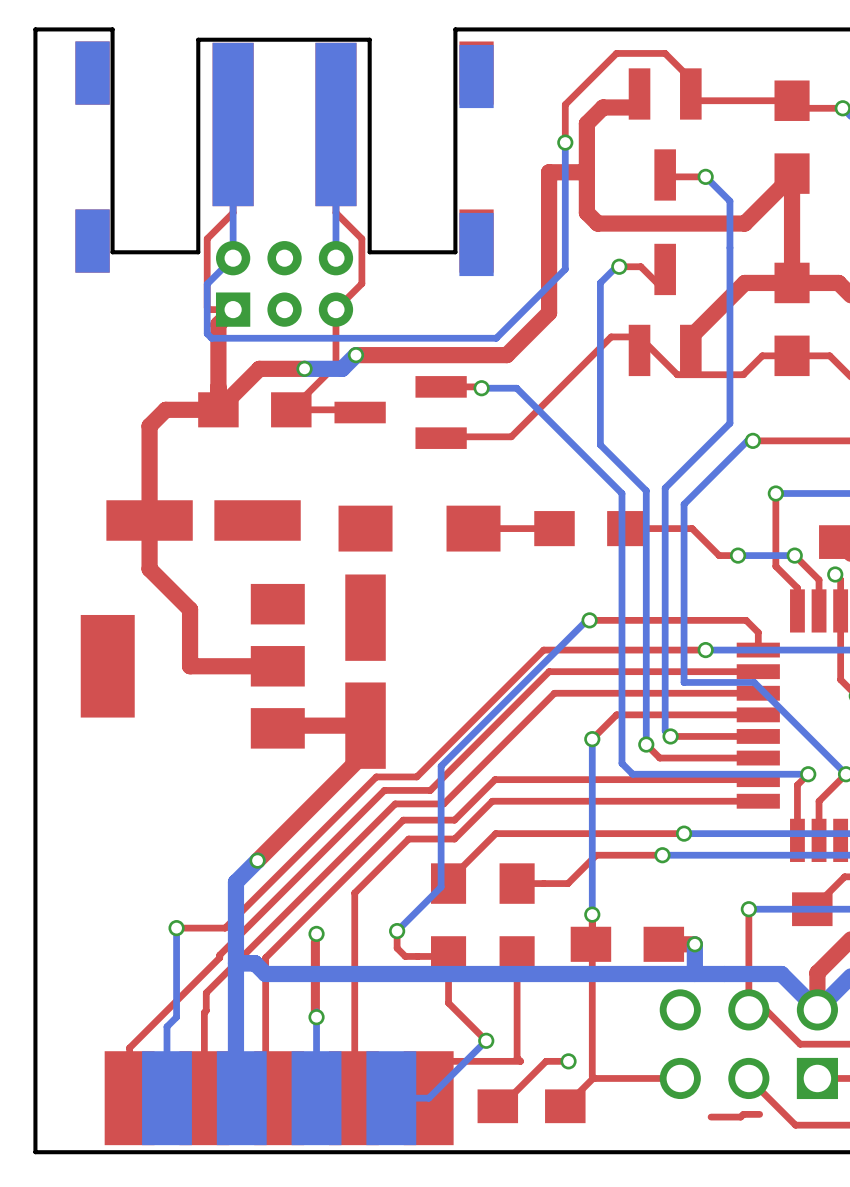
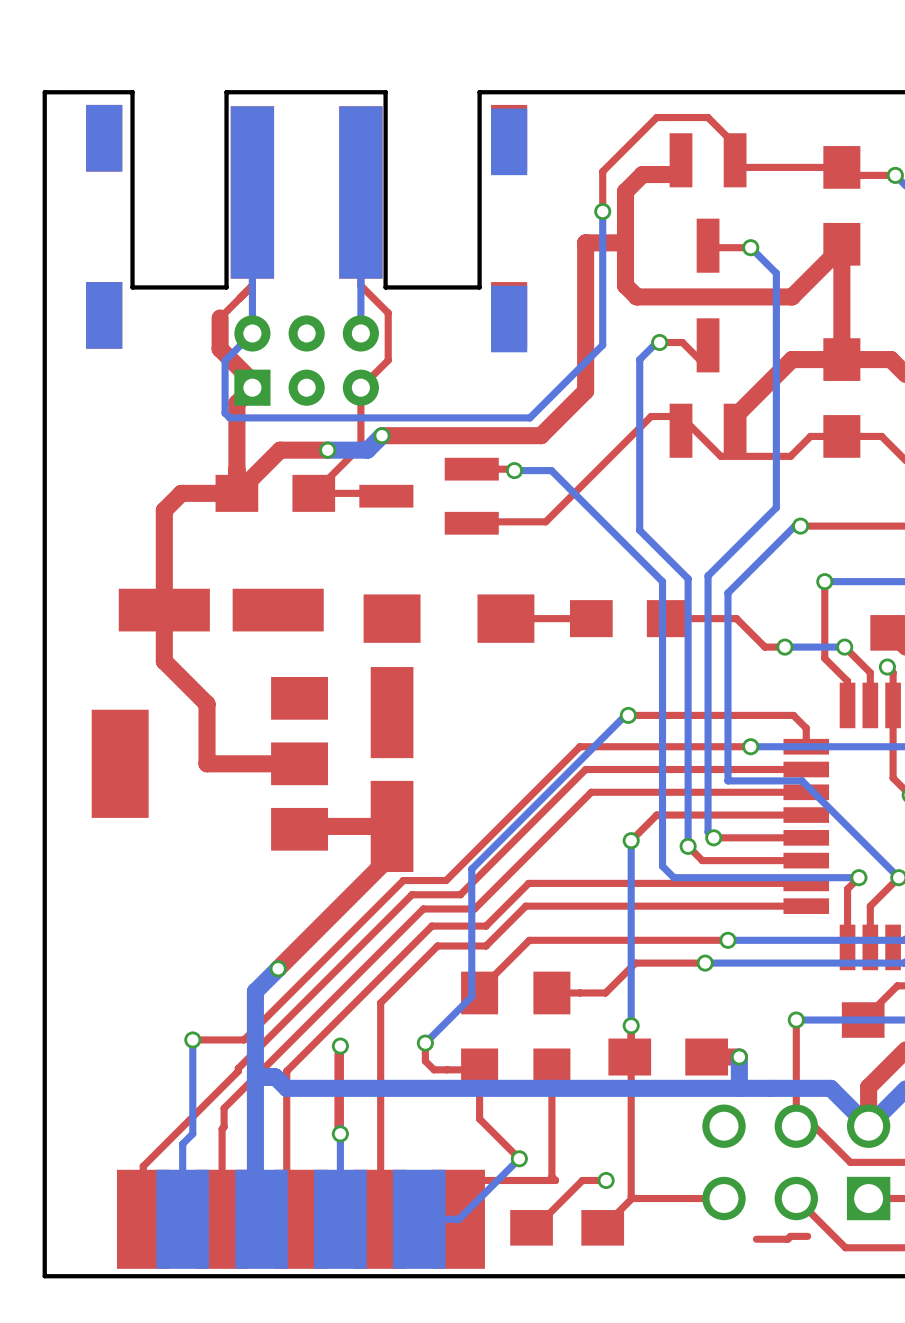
board edge: (455, 29) (455, 252) (369, 252) (369, 39) (198, 39) (198, 252) (112, 252) (112, 29) (35, 29) (36, 1152) -> (486, 92) (479, 92) (479, 287) (385, 287) (385, 92) (226, 92) (226, 287) (132, 287) (132, 92) (44, 92) (44, 1276)
top track: (207, 238) (207, 307) (209, 309) (233, 309) -> (220, 317) (220, 348) (252, 381) (252, 387)

